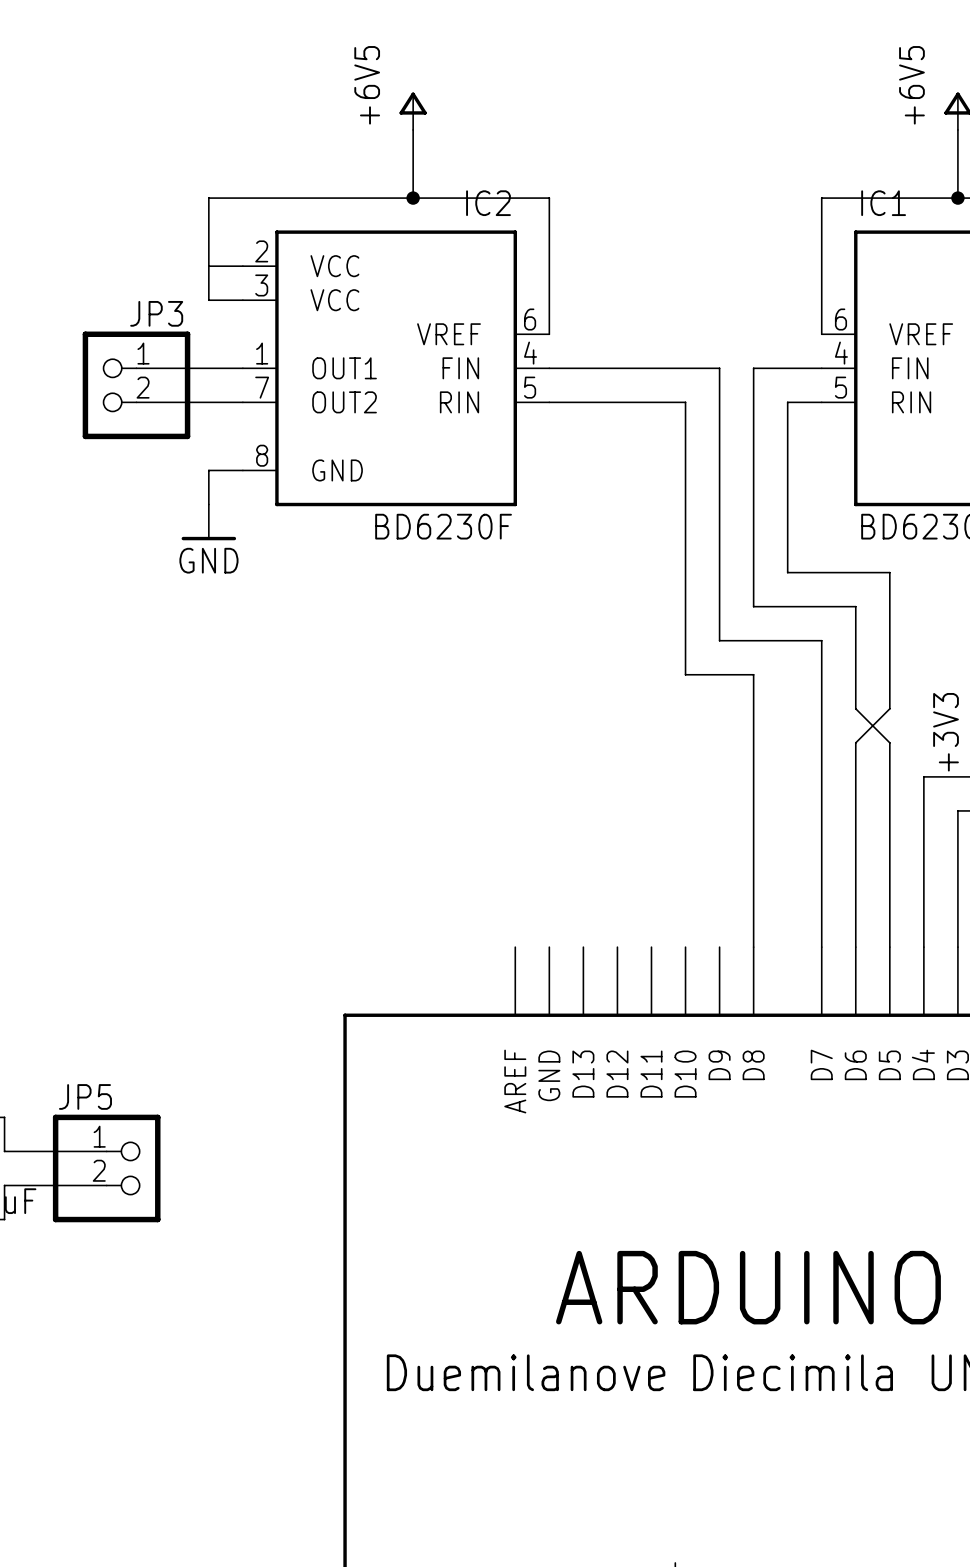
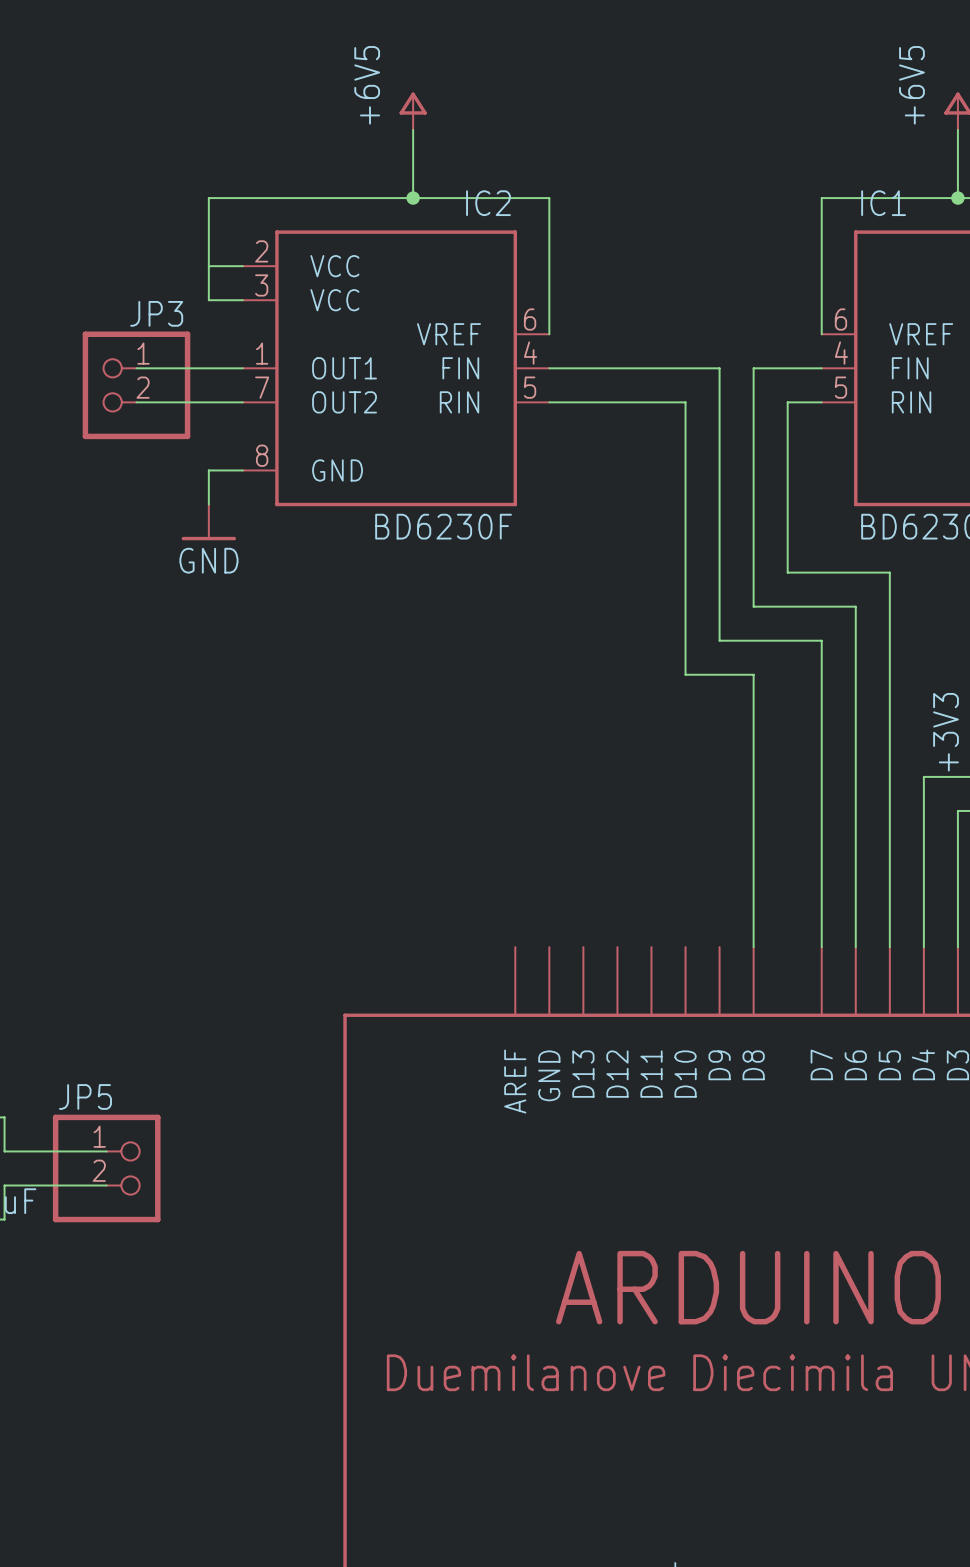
wire: (855, 708) (889, 742) -> (855, 708) (855, 742)
wire: (889, 708) (855, 742) -> (889, 708) (889, 742)

